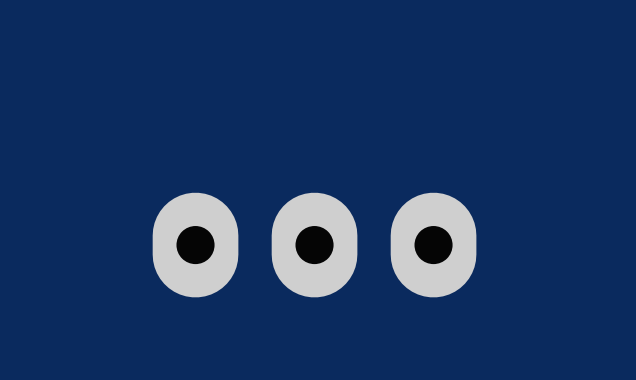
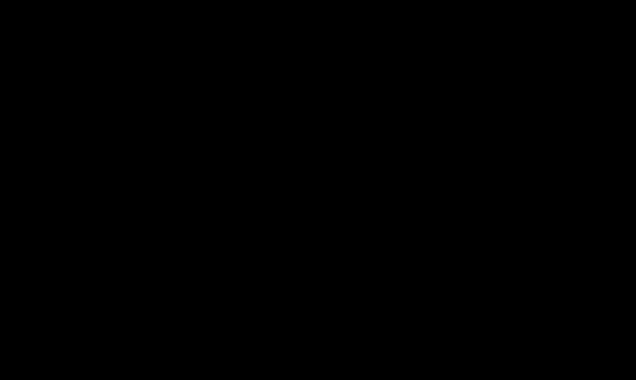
part: (314, 245) -> none

